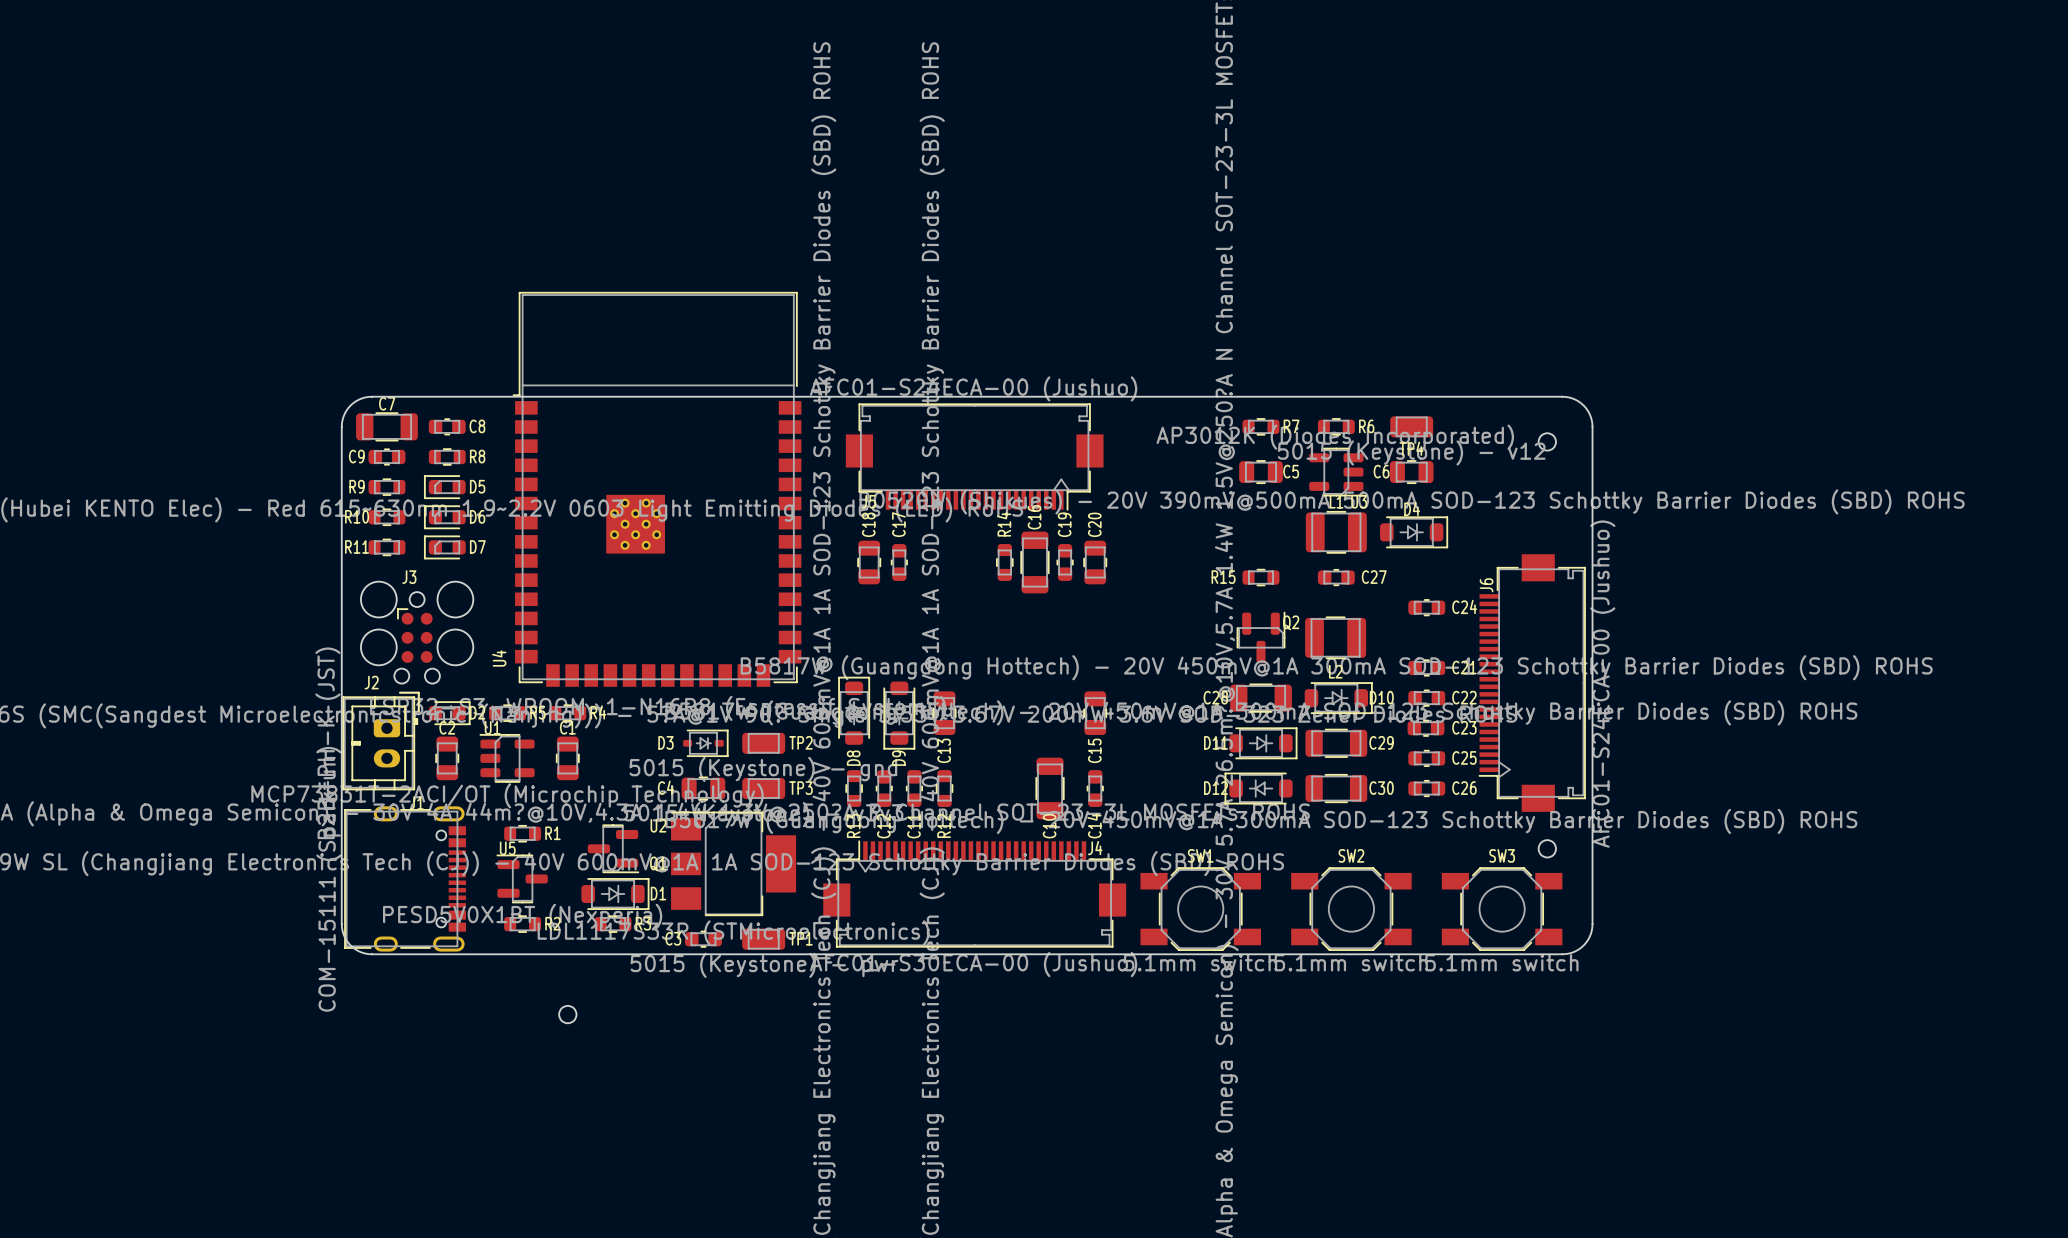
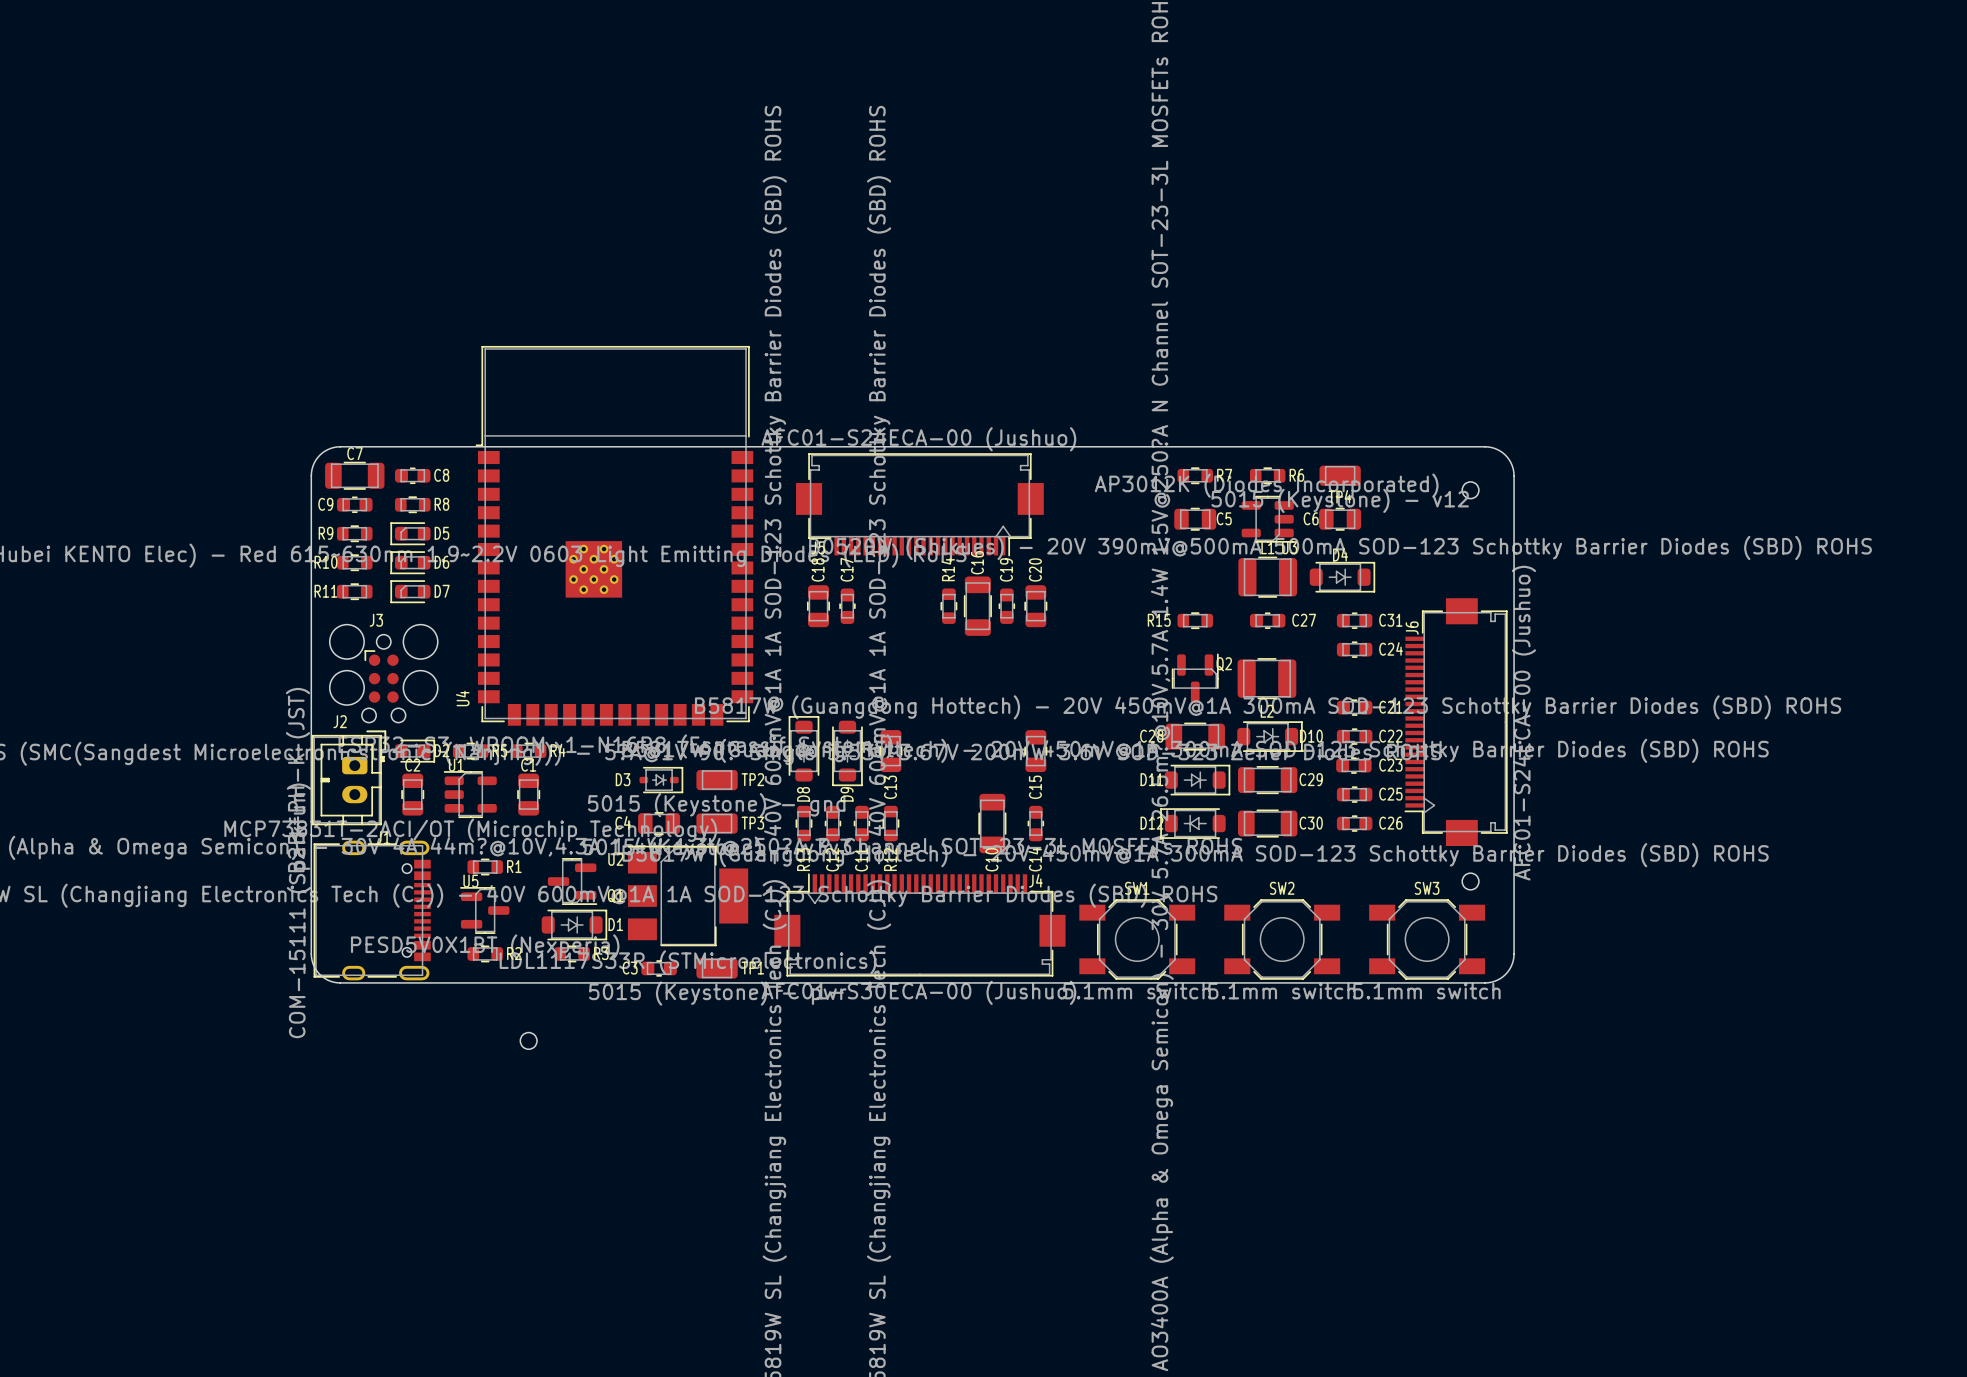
C31: none -> (1354, 620)

